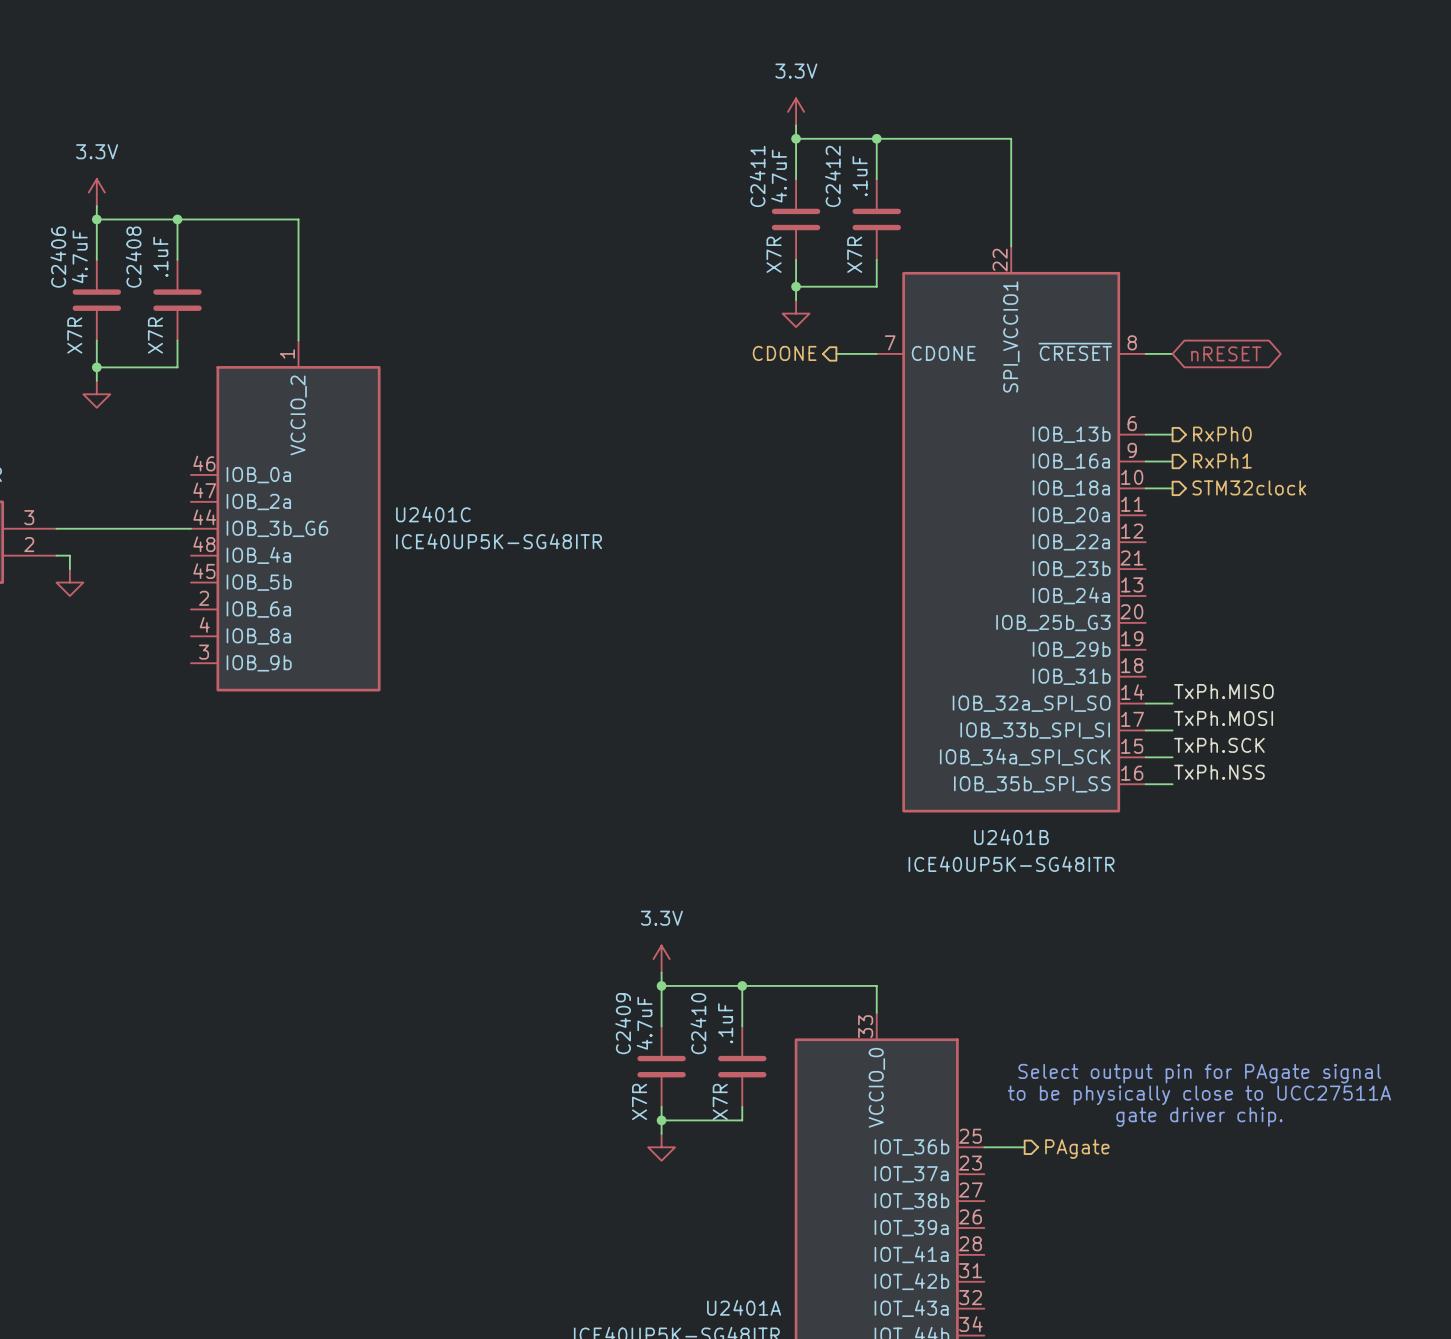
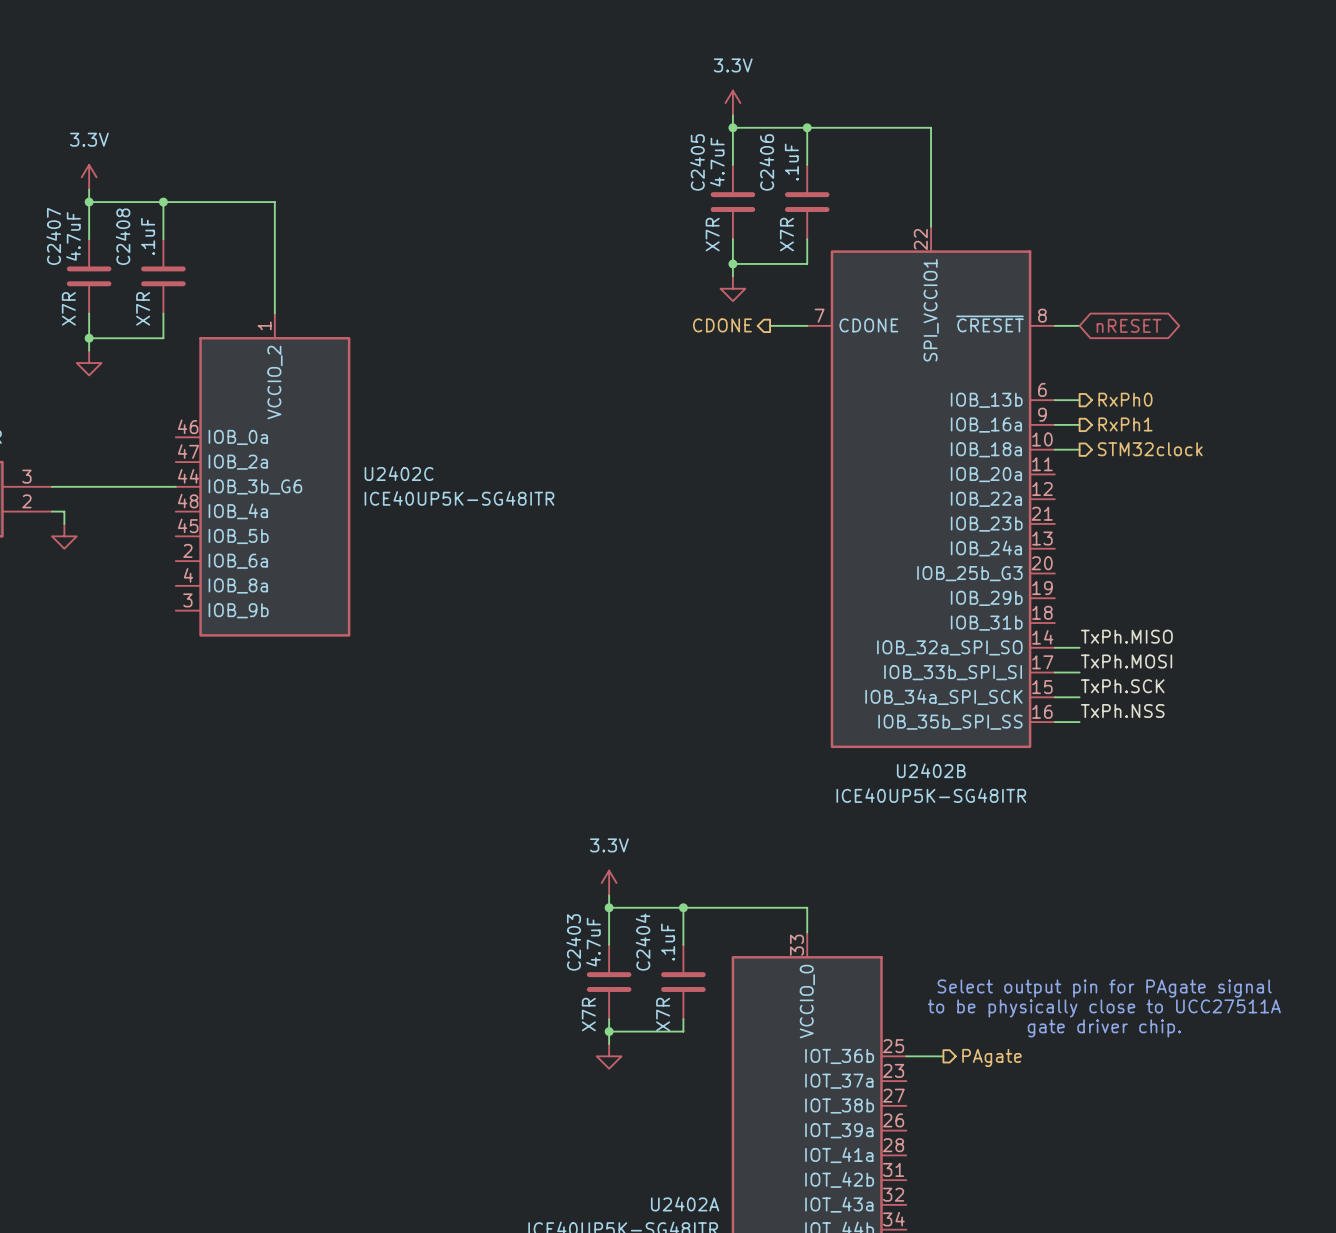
C2411 name: C2411 (757, 176) -> C2405 (697, 162)
C2412 name: C2412 (832, 176) -> C2406 (766, 162)
C2406 name: C2406 (58, 257) -> C2407 (53, 236)
U2401C name: U2401C (433, 514) -> U2402C (399, 473)
U2401B name: U2401B (1011, 837) -> U2402B (931, 770)
C2409 name: C2409 (623, 1023) -> C2403 (573, 942)
C2410 name: C2410 (698, 1023) -> C2404 (643, 942)
U2401A name: U2401A (744, 1307) -> U2402A (685, 1204)

